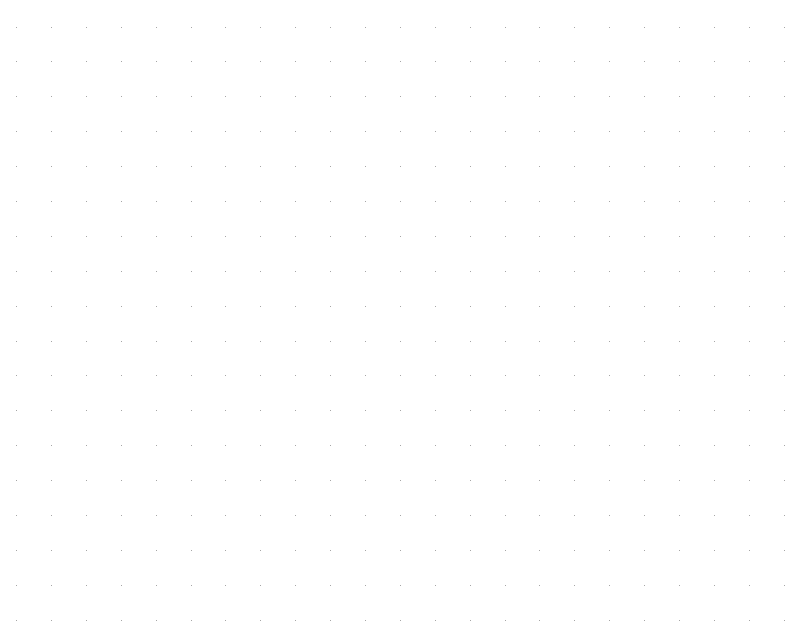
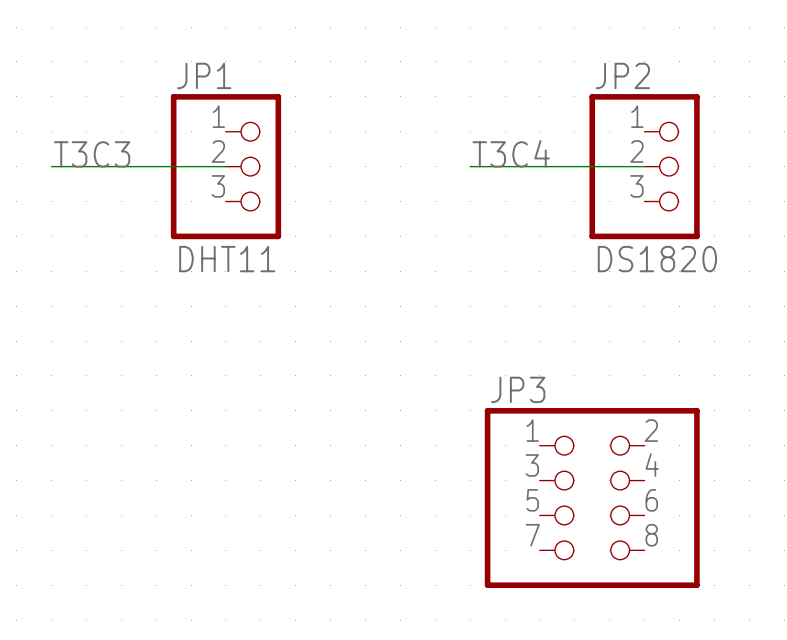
label: none -> T3C4 (511, 153)
label: none -> T3C3 (92, 154)
wire: none -> (51, 166) (225, 166)
JP1: none -> DHT11 (225, 166)
wire: none -> (470, 166) (644, 166)
JP2: none -> DS1820 (644, 166)
JP3: none -> (592, 498)

